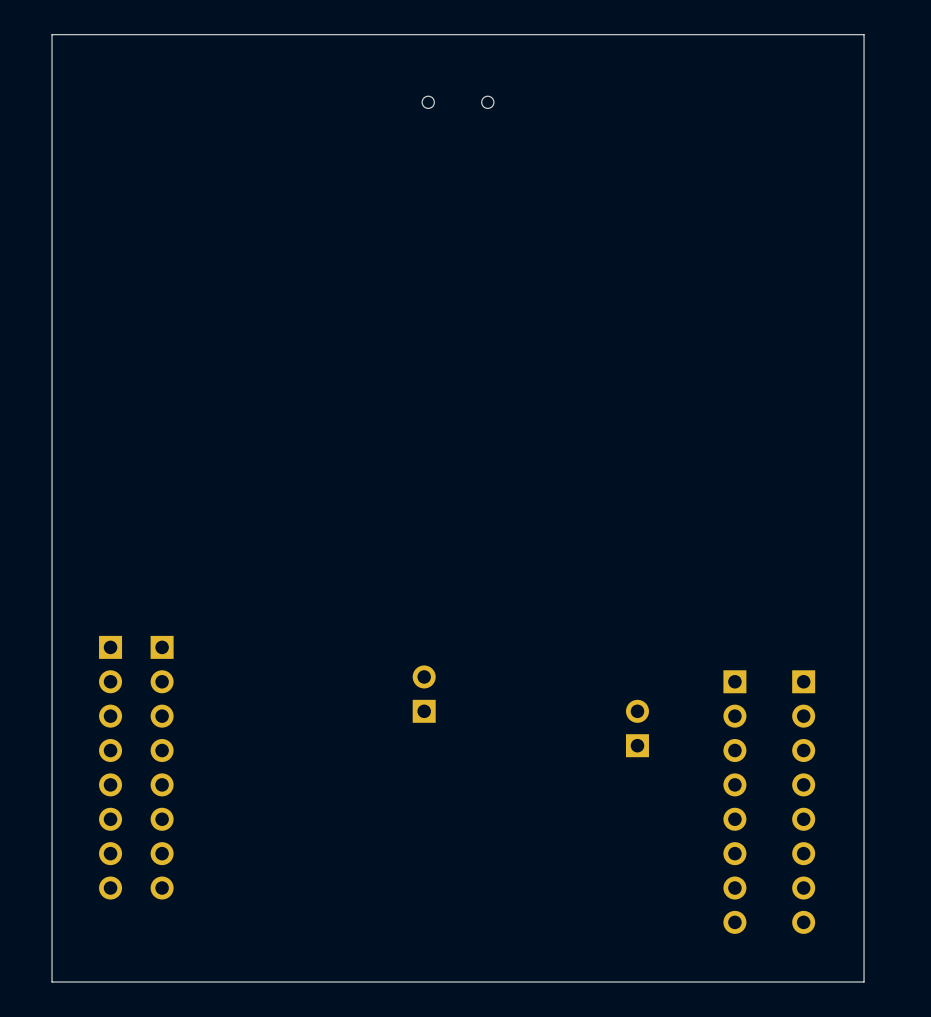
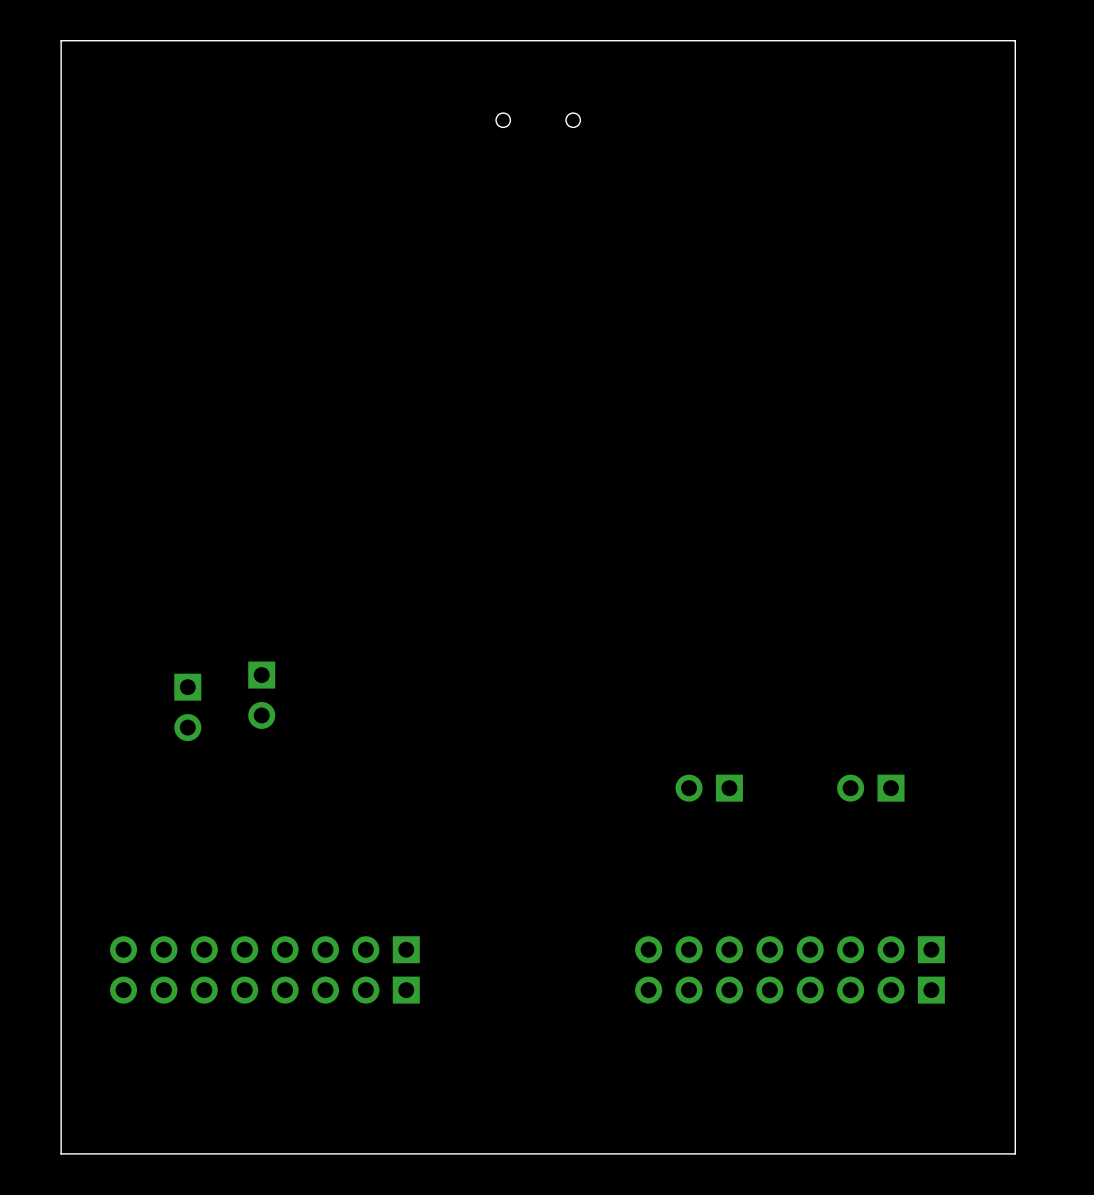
part: none -> (261, 695)
part: none -> (187, 707)
part: none -> (709, 788)
part: none -> (870, 788)
part: (424, 694) -> none
part: (637, 728) -> none
part: (110, 767) -> none
part: (162, 767) -> none
part: (734, 802) -> none
part: (803, 802) -> none
part: none -> (264, 949)
part: none -> (790, 949)
part: none -> (264, 990)
part: none -> (790, 990)

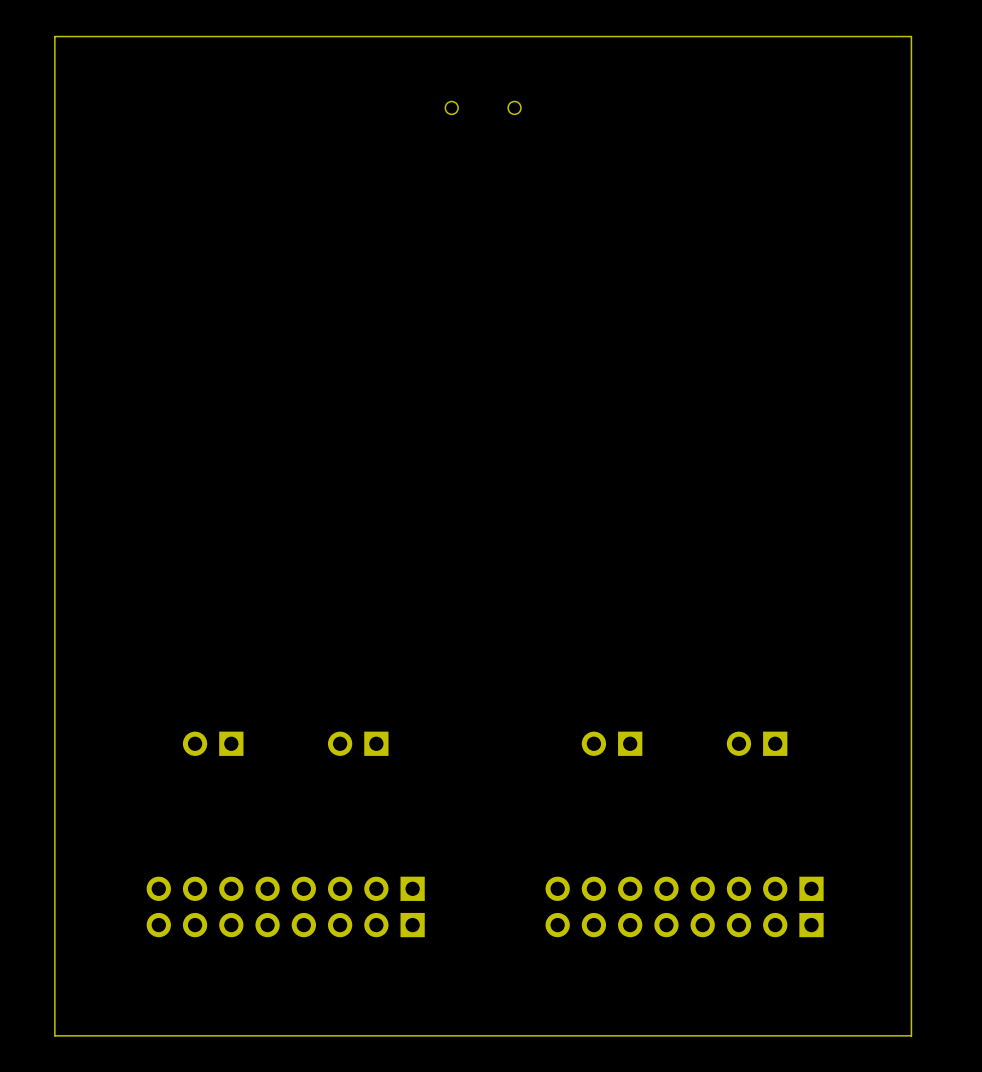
part: (261, 695) -> none
part: (187, 707) -> none
part position: (709, 788) -> (612, 743)
part position: (870, 788) -> (757, 743)
part: none -> (213, 743)
part: none -> (358, 743)
part: (264, 949) -> none
part: (790, 949) -> none
part: (264, 990) -> none
part: none -> (285, 888)
part: none -> (684, 888)
part: (790, 990) -> none
part: none -> (285, 925)
part: none -> (684, 925)

